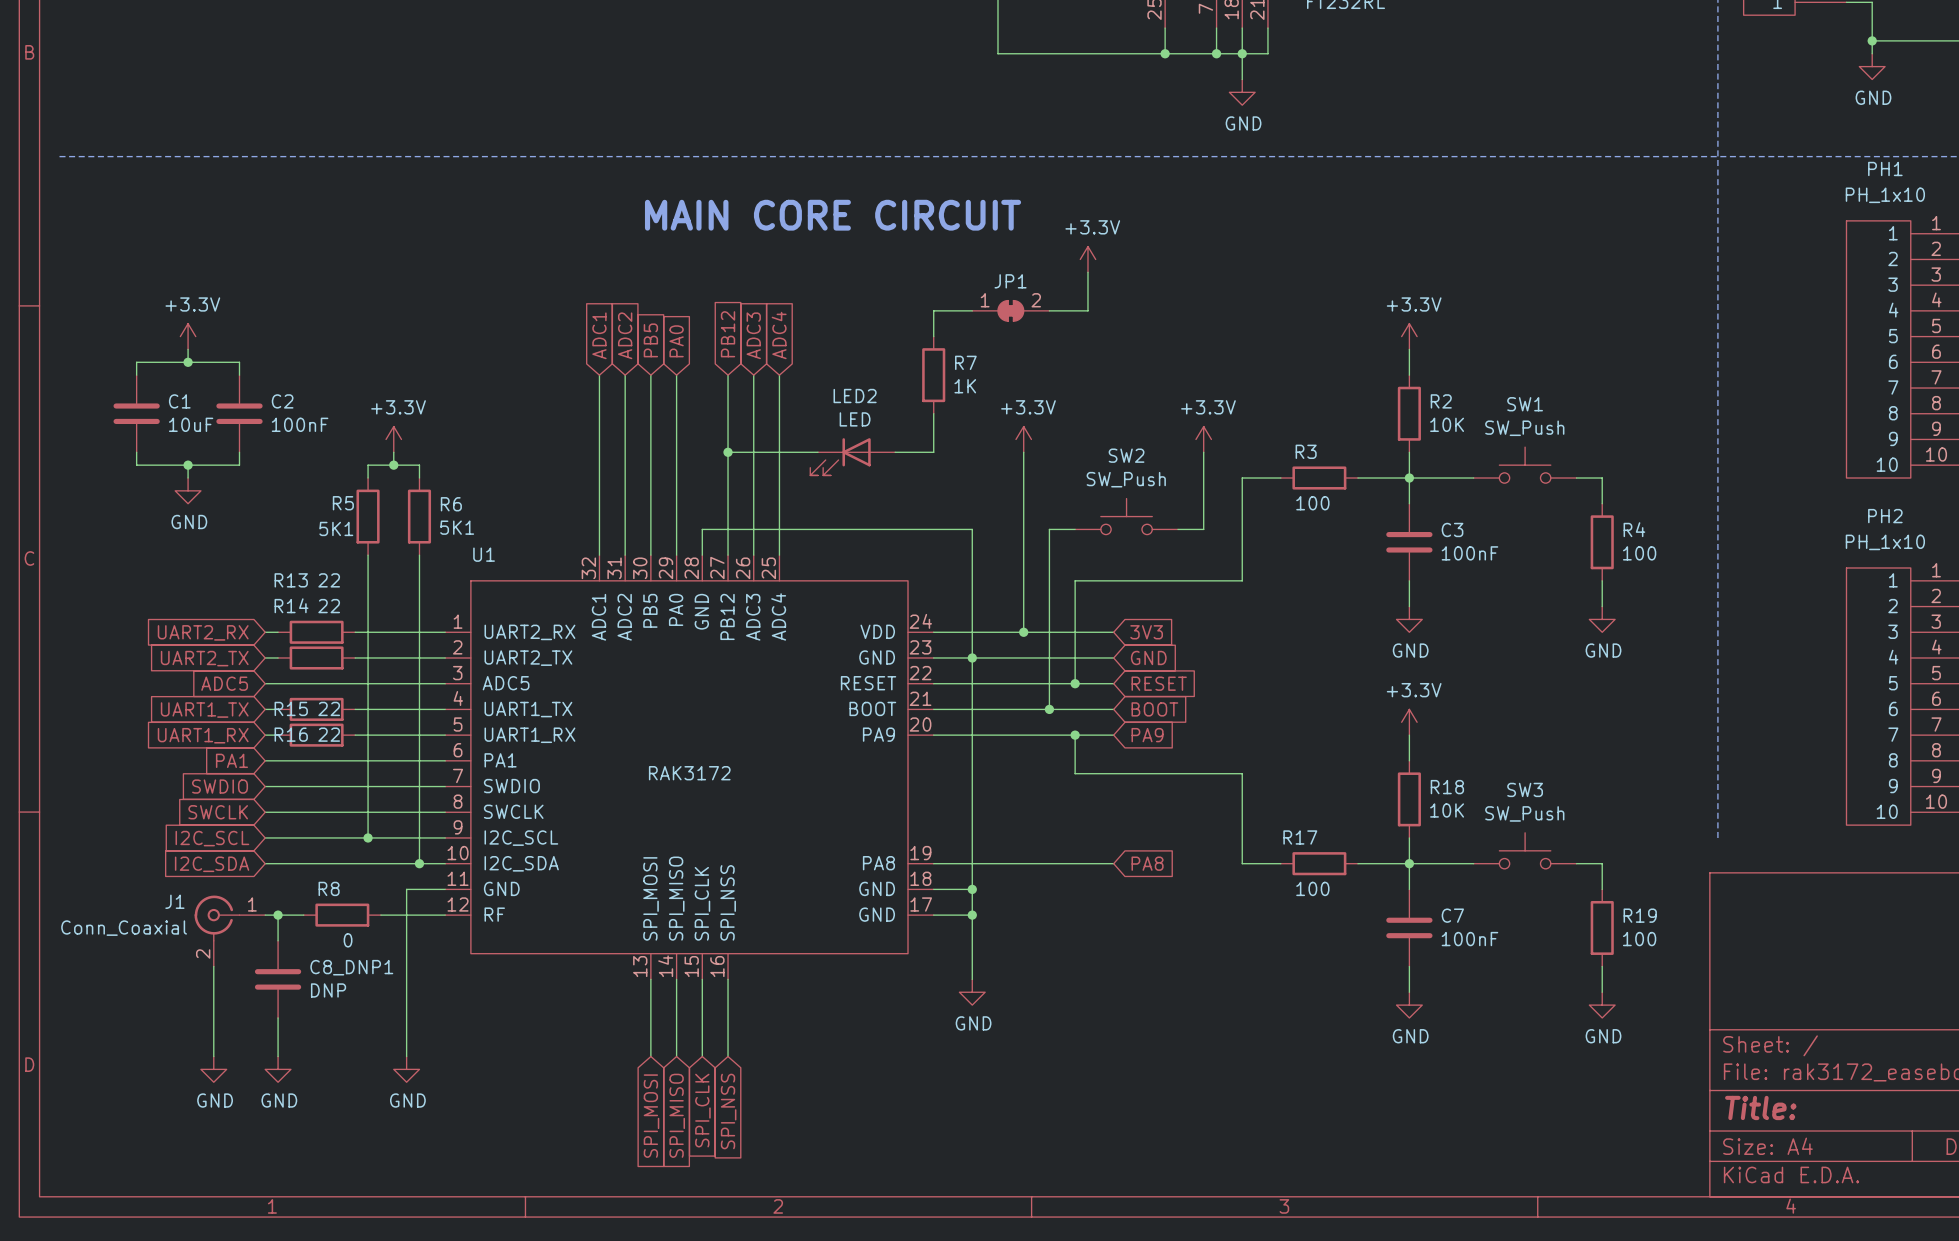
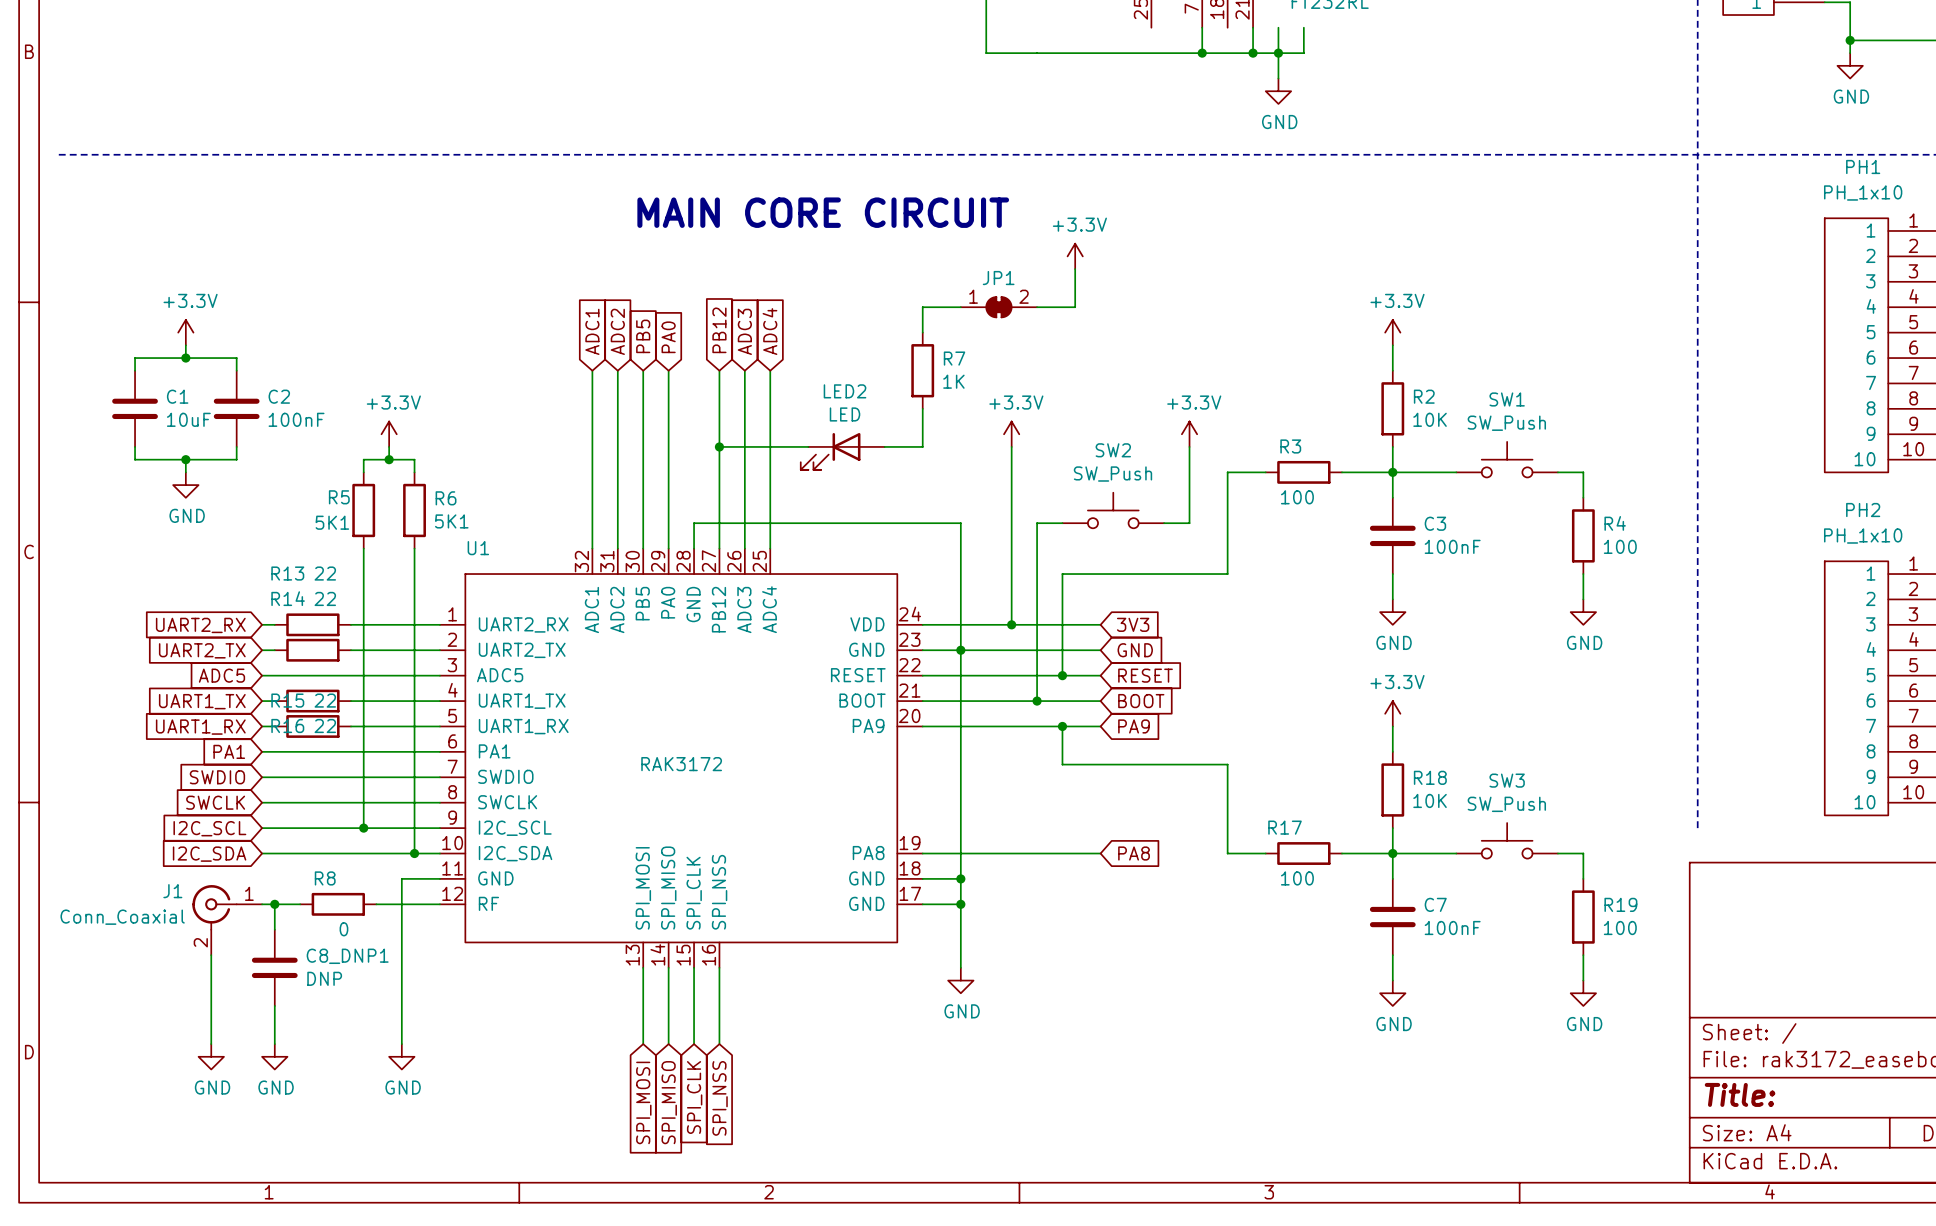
wire: (1165, 28) (1165, 53) -> none
wire: (1242, 28) (1242, 79) -> (1278, 27) (1278, 78)
wire: none -> (1303, 27) (1303, 53) (1253, 53)
junction: (1165, 53) -> none
junction: (1242, 53) -> none
junction: none -> (1253, 53)
junction: none -> (1278, 53)
power symbol position: GND (1242, 92) -> GND (1278, 91)

